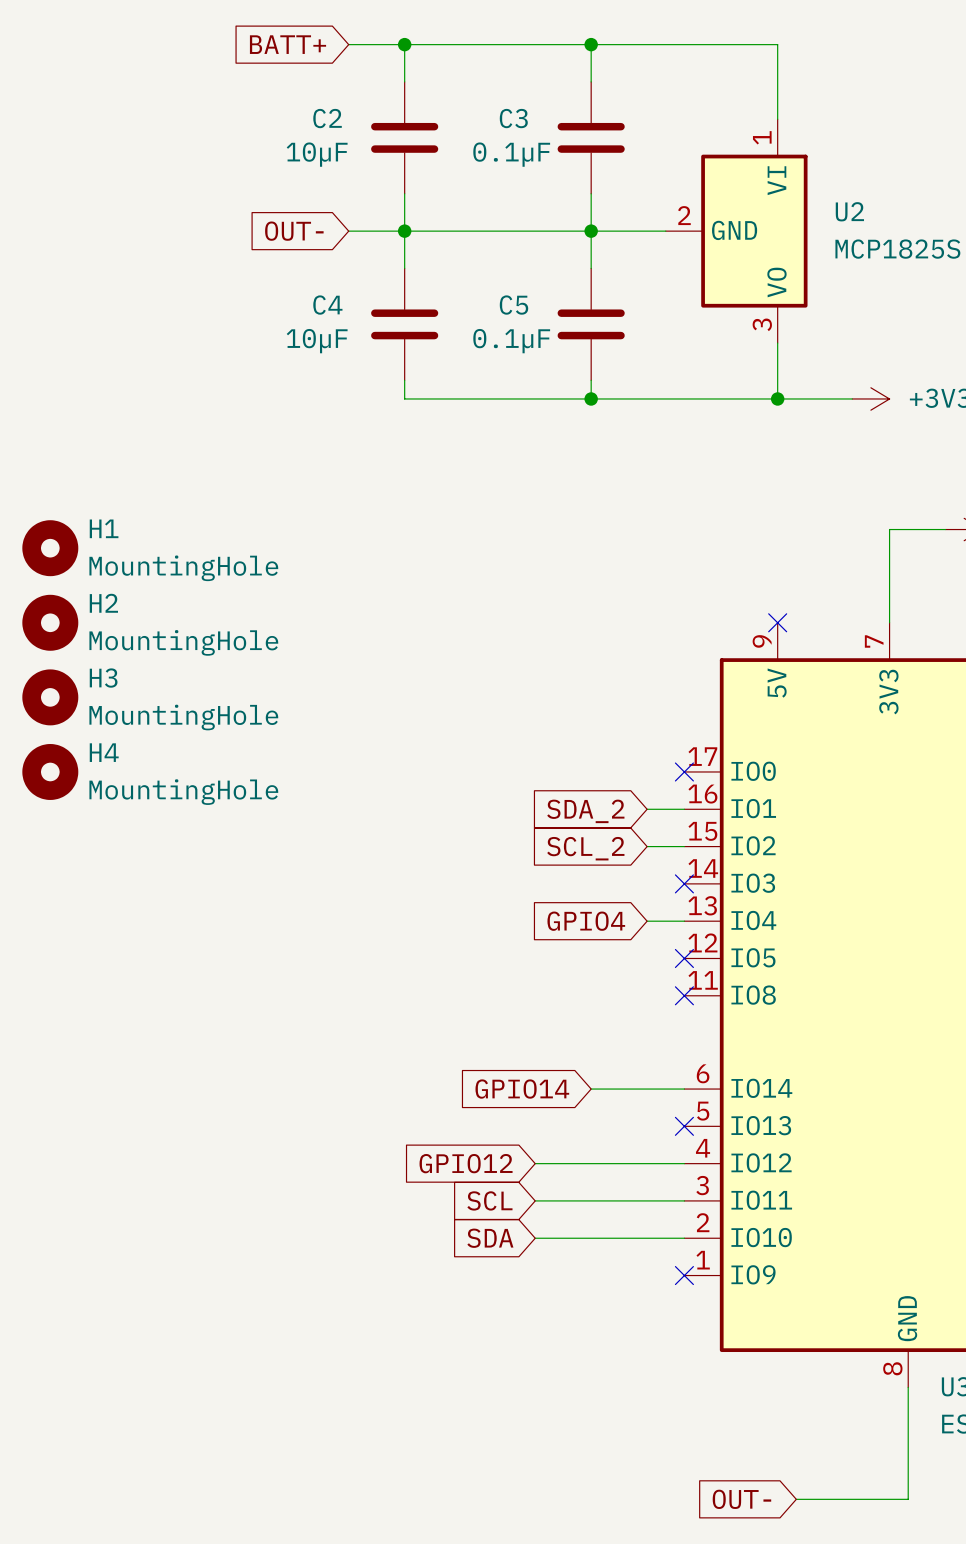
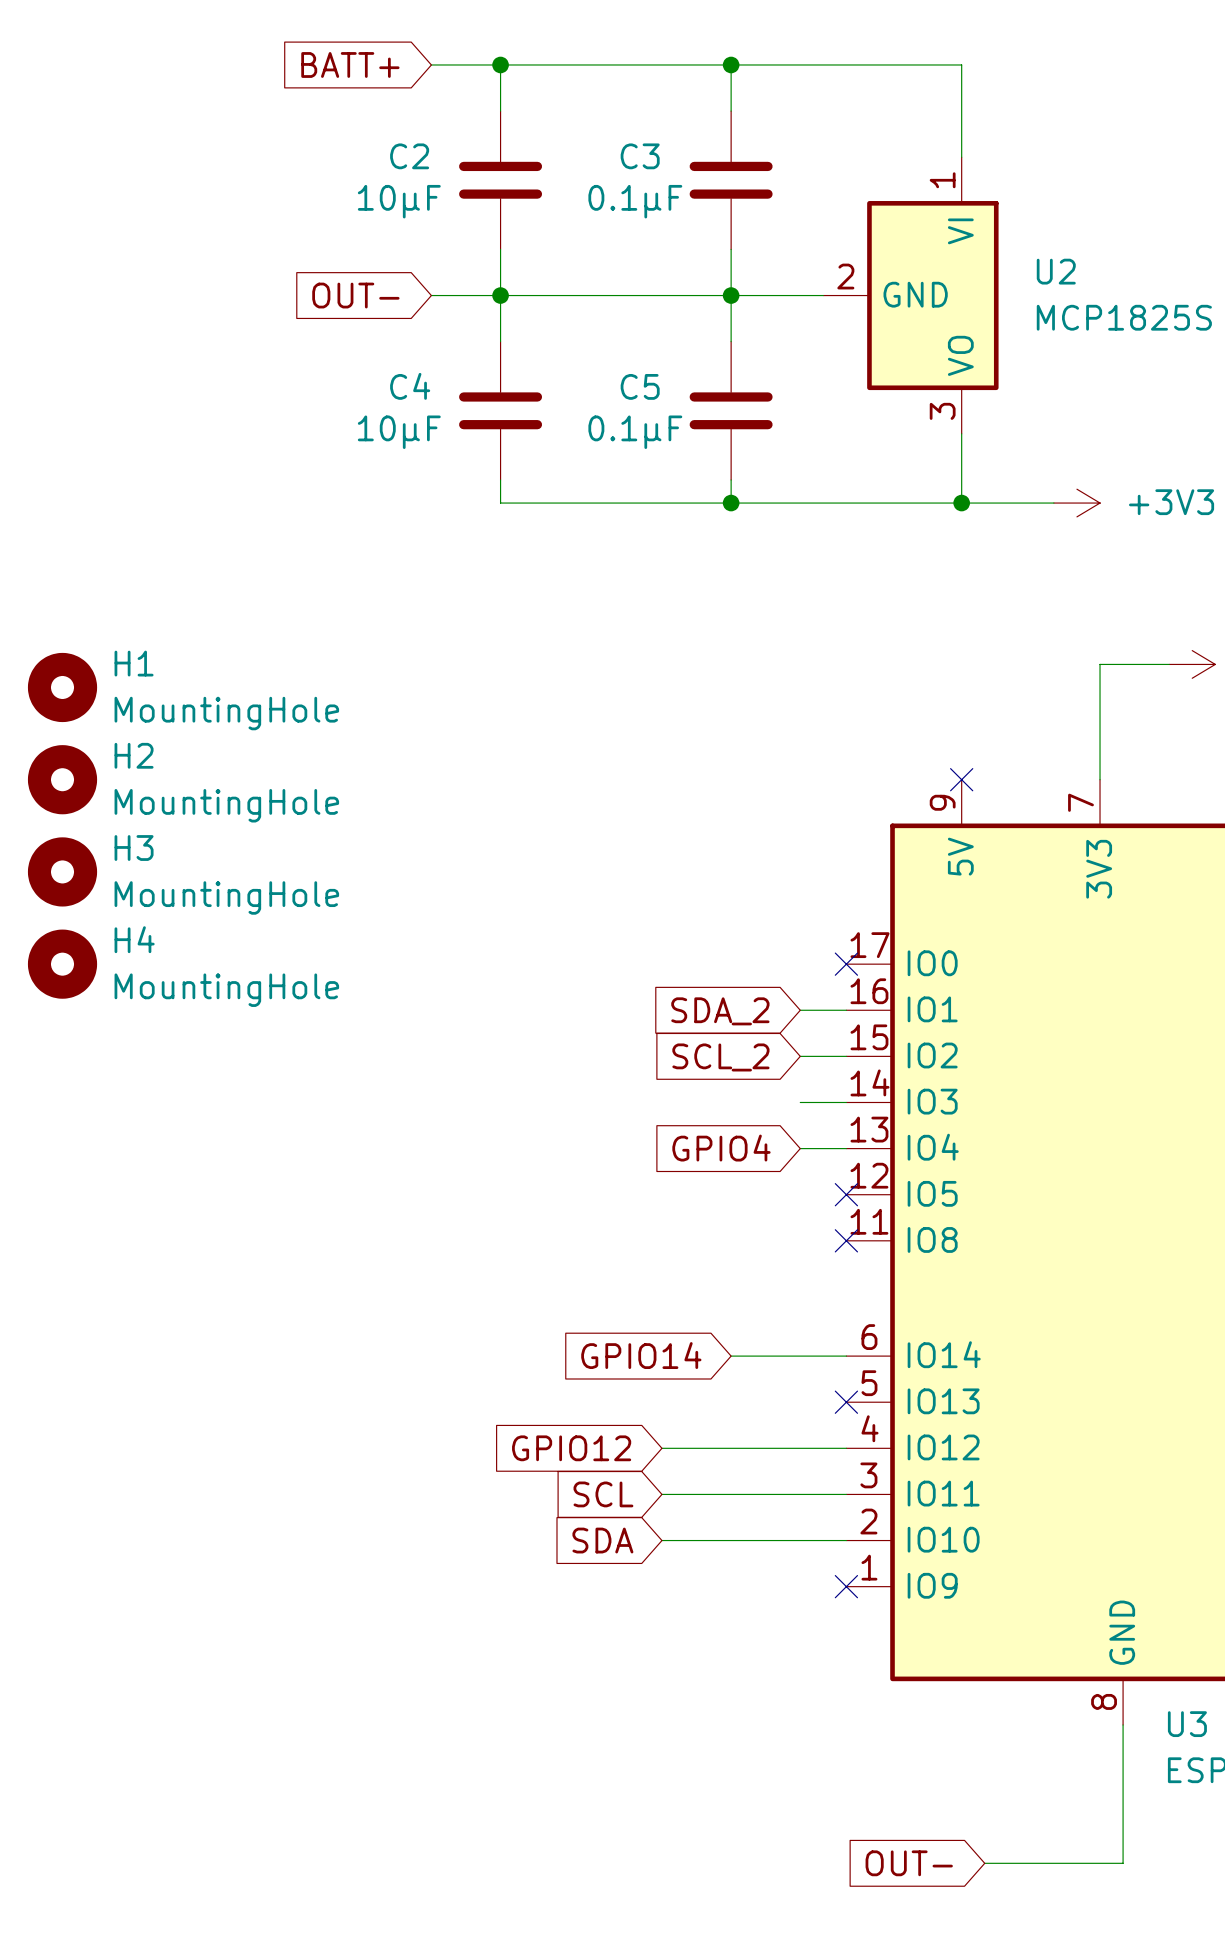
wire: none -> (800, 1102) (846, 1102)
no-connect mark: (684, 883) -> none

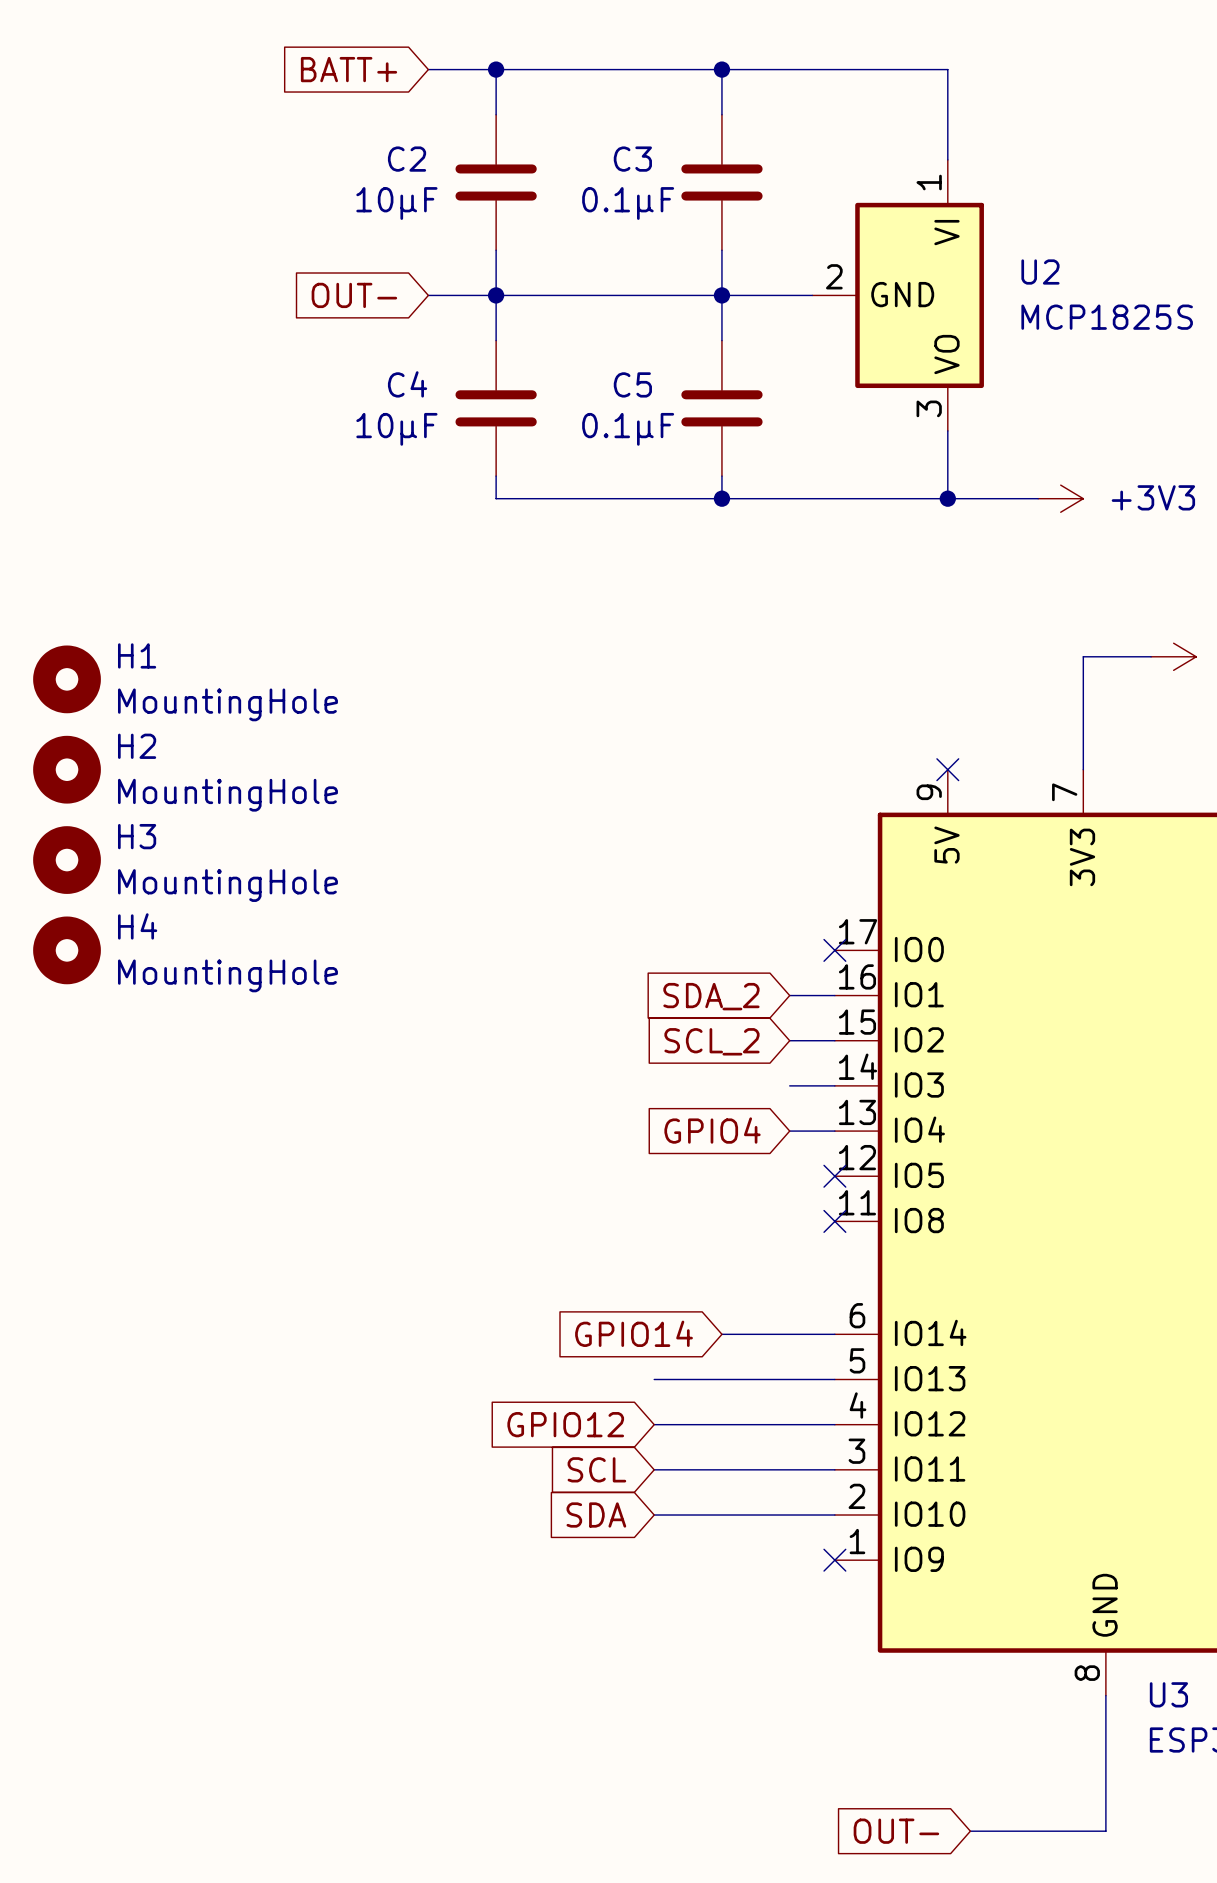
wire: none -> (654, 1379) (834, 1379)
no-connect mark: (846, 1402) -> none

